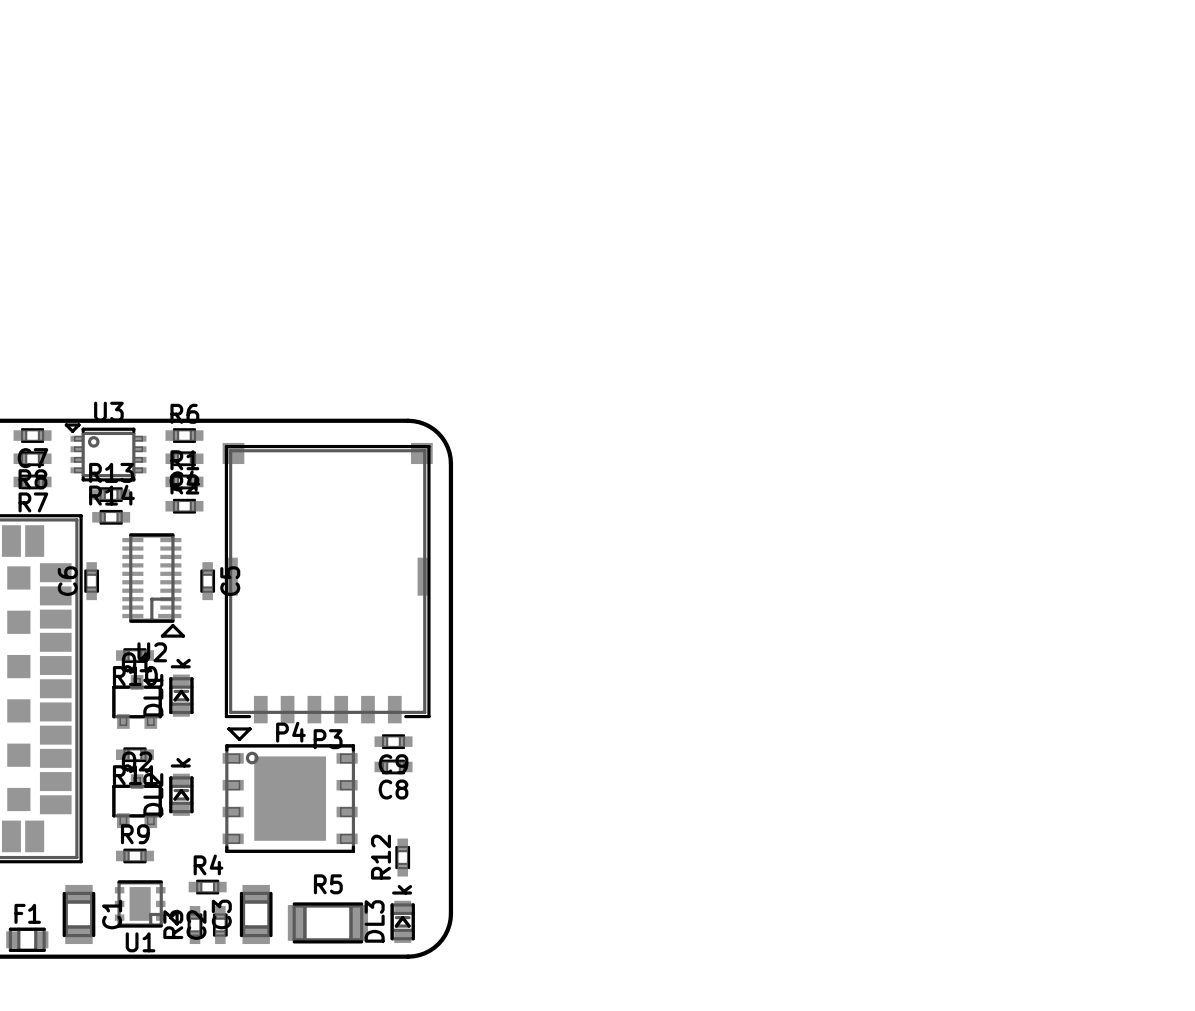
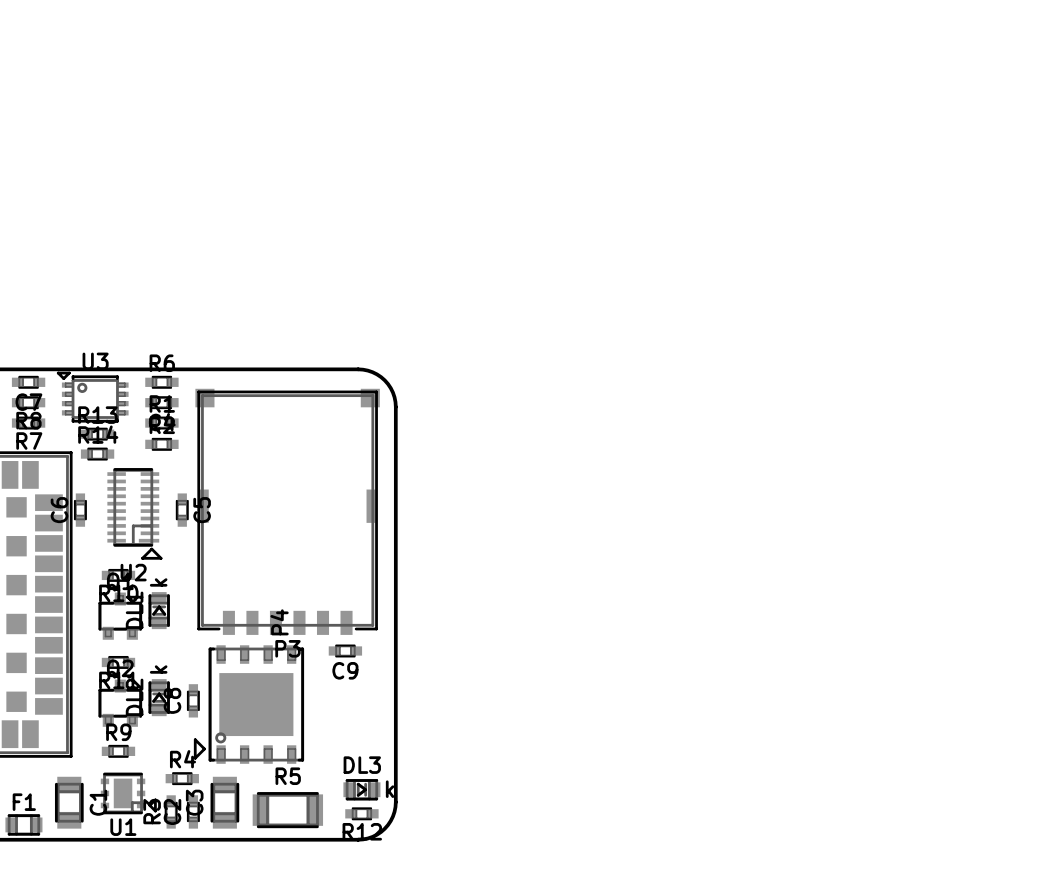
P4 name position: P4 (290, 732) -> P4 (279, 622)
C8 rotation: 0° (393, 766) -> 90° clockwise (193, 700)
C8 position: (393, 766) -> (193, 700)
P4 rotation: 0° (290, 790) -> 90° counterclockwise (248, 704)
R12 rotation: 0° (402, 857) -> 90° clockwise (361, 813)
R12 position: (402, 857) -> (361, 813)
DL3 rotation: 0° (402, 921) -> 90° clockwise (361, 789)

